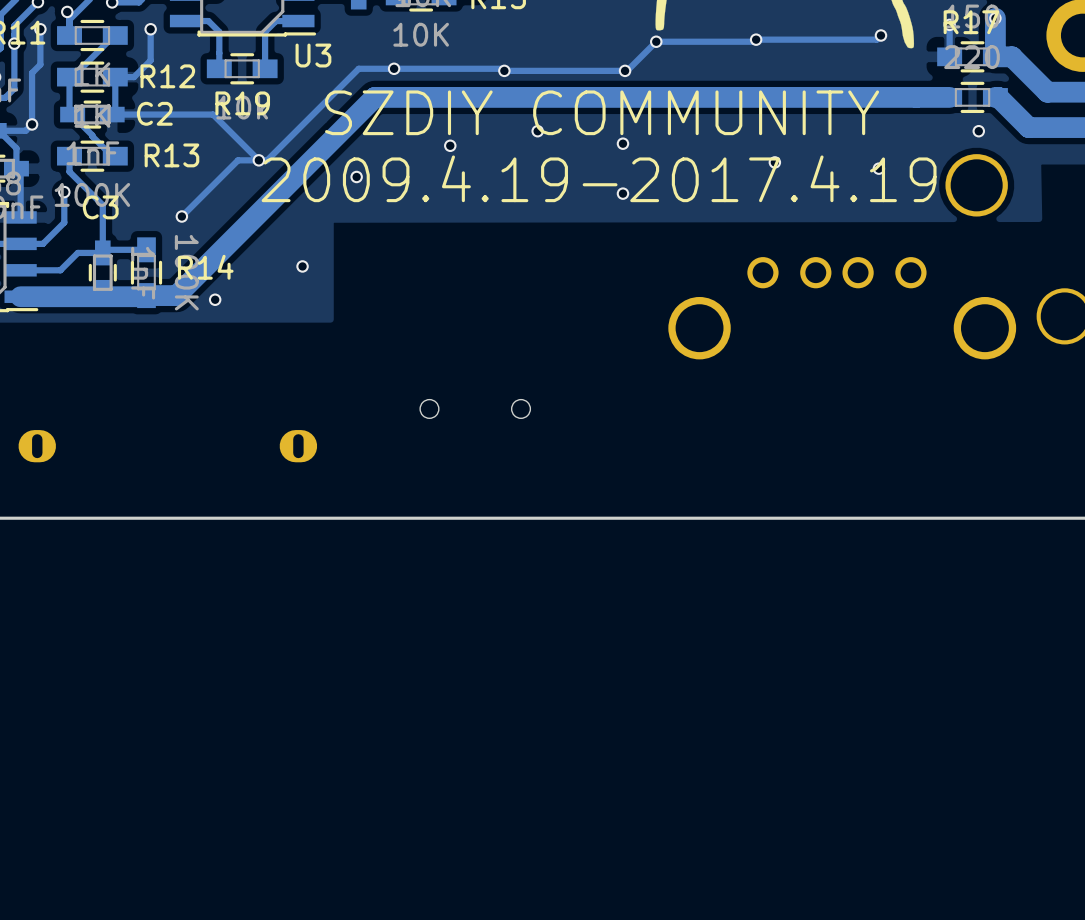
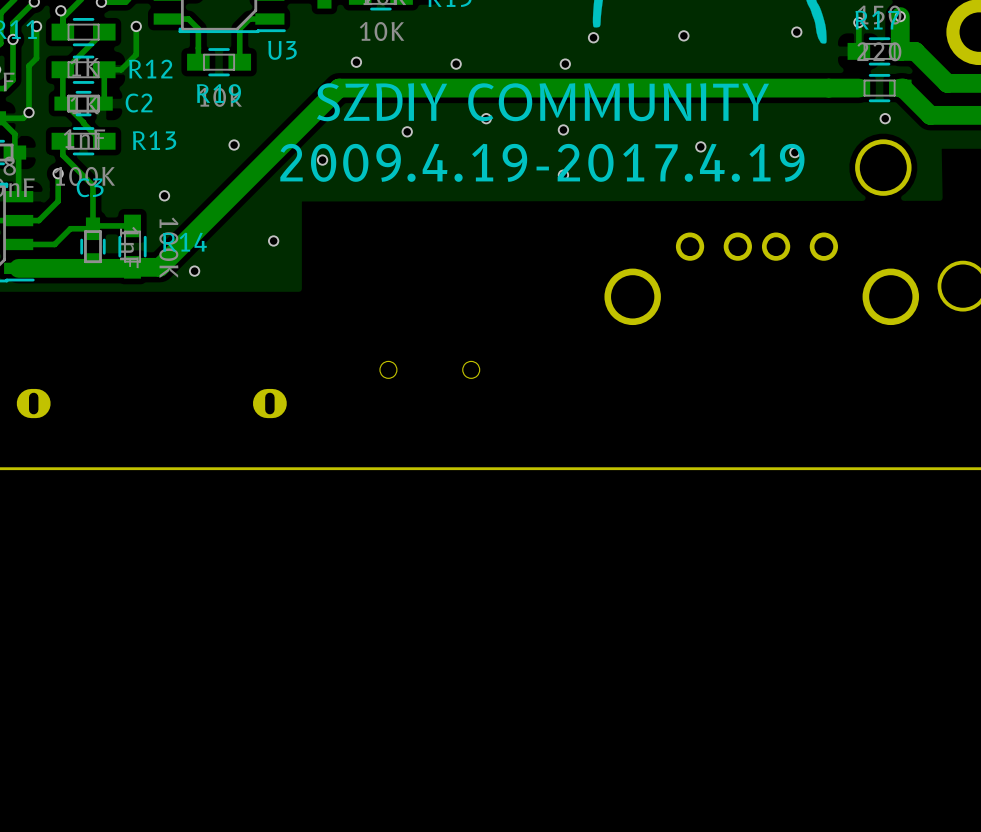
track: (880, 35) (876, 39) (656, 41) (627, 70) (358, 68) (267, 160) (238, 160) (181, 216) -> none
track: (112, 114) (213, 114) (258, 160) -> none

